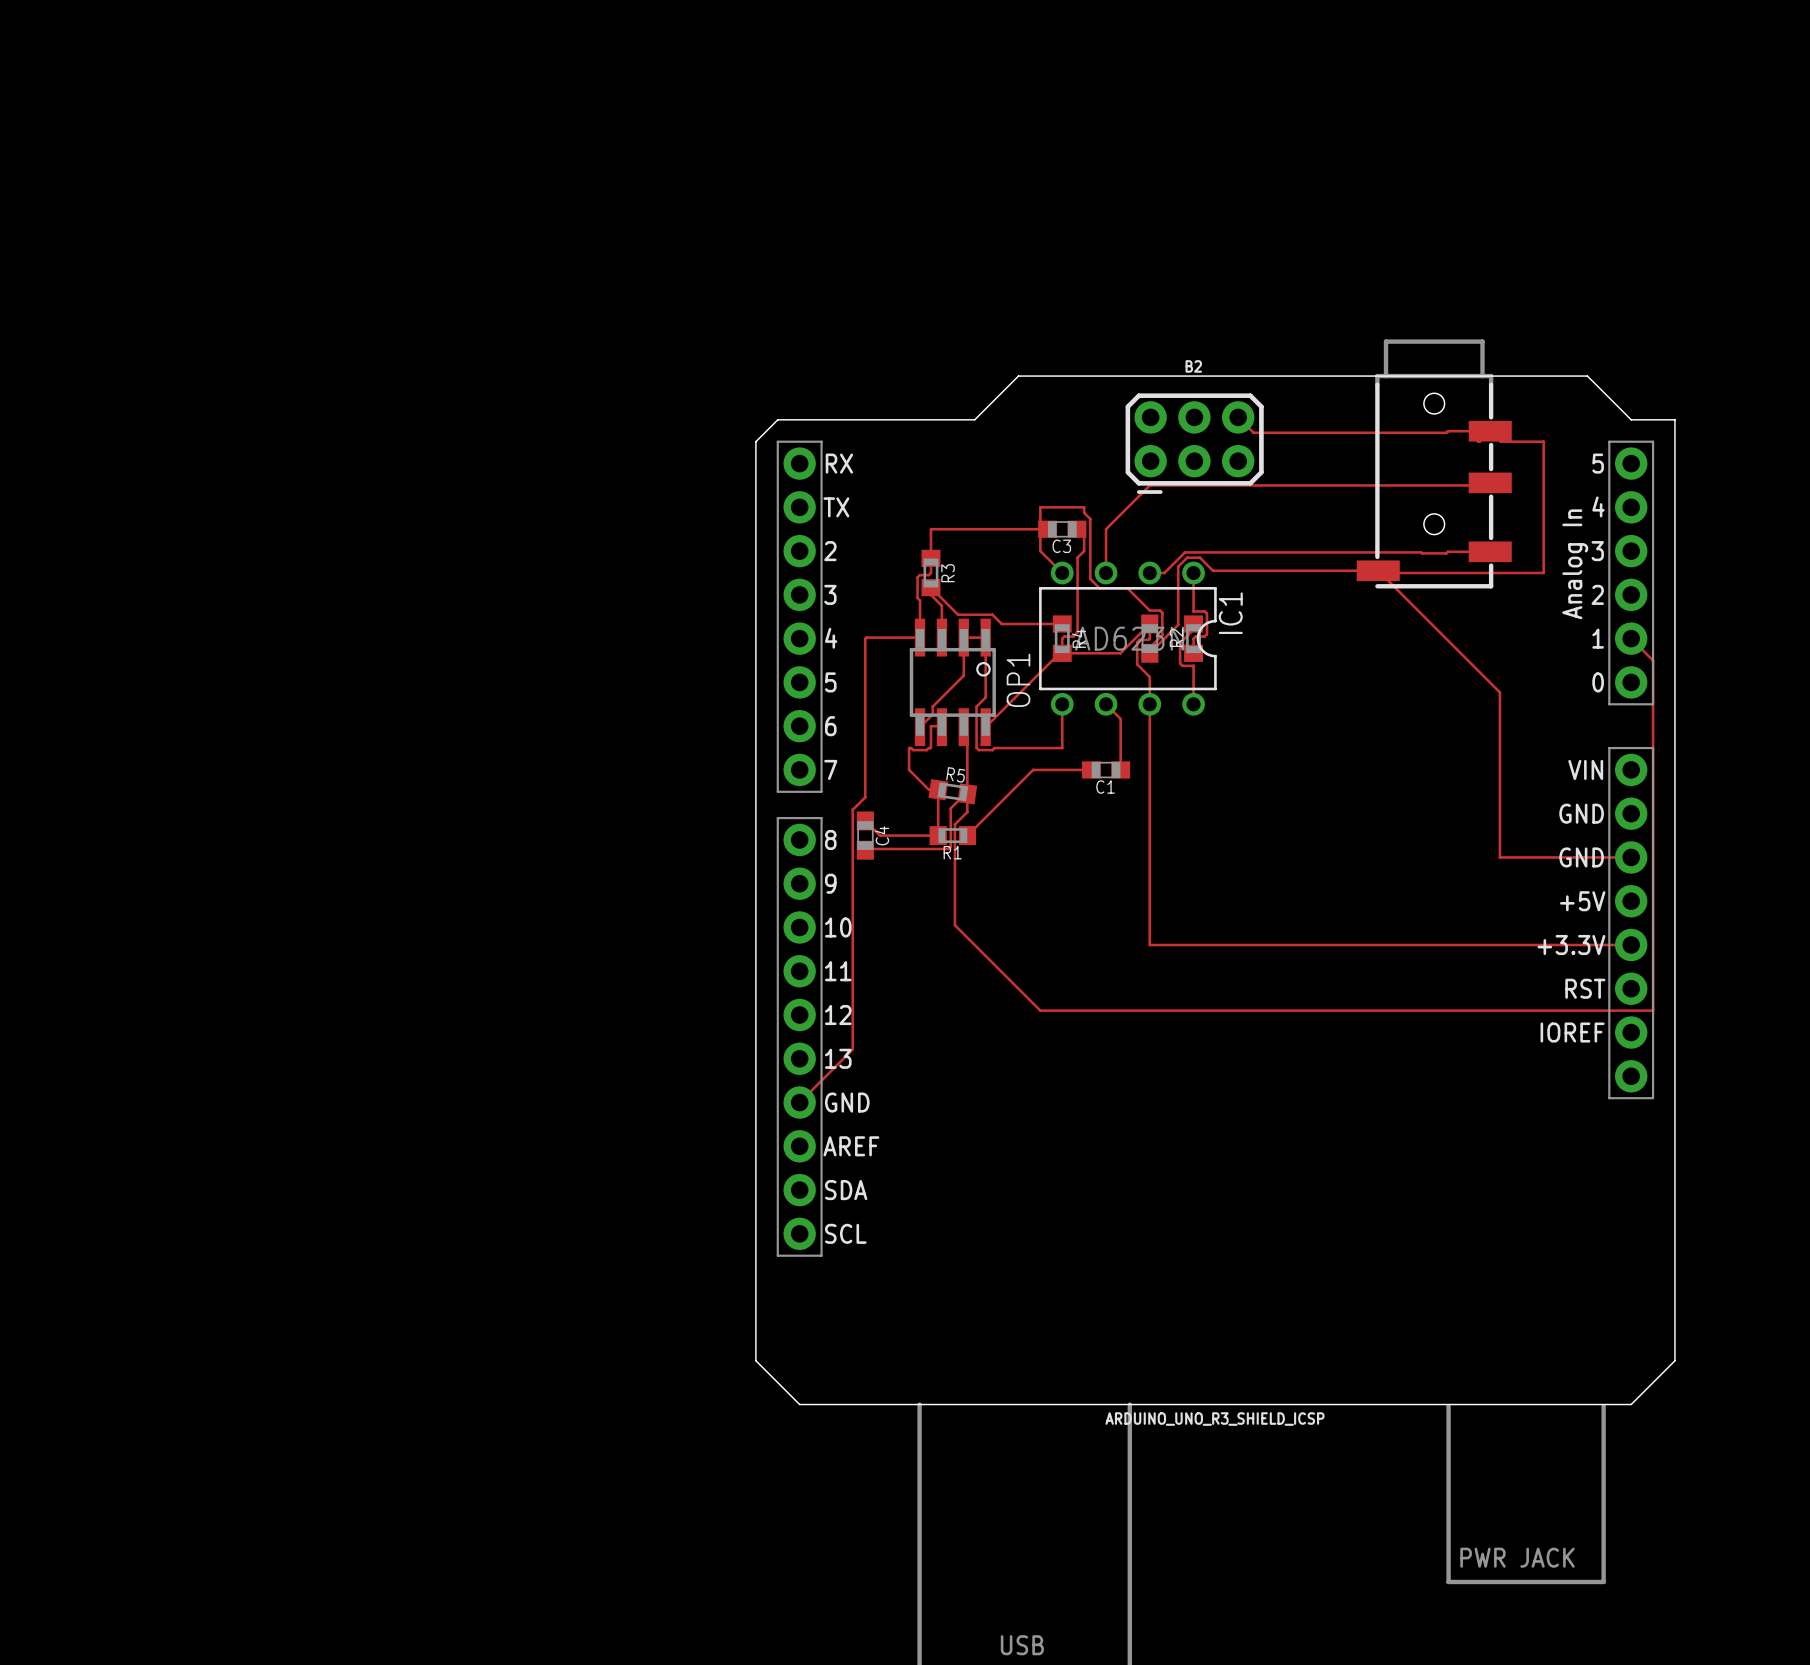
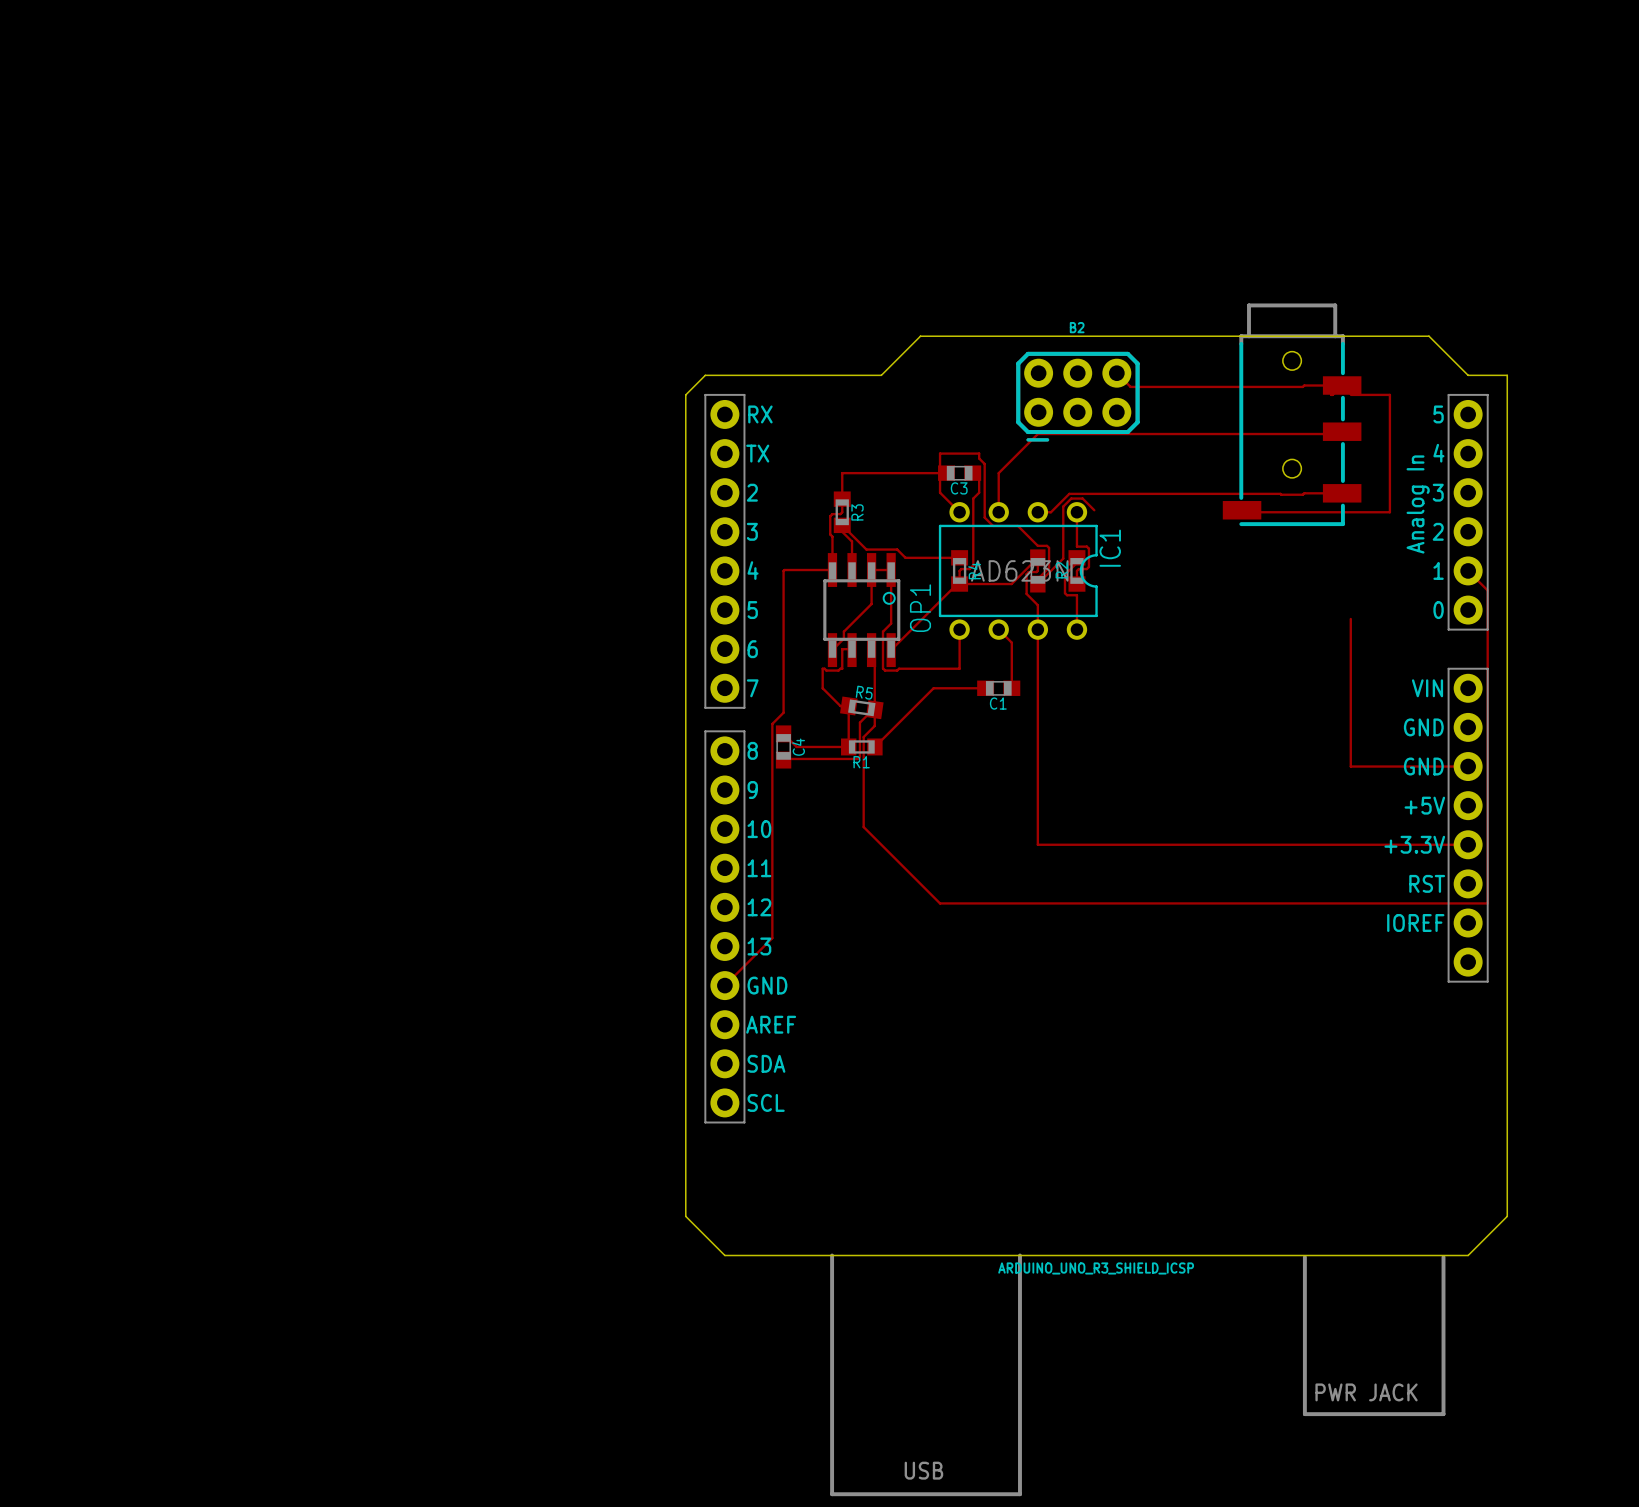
top track: (1212, 570) (1378, 570) (1499, 692) -> none

